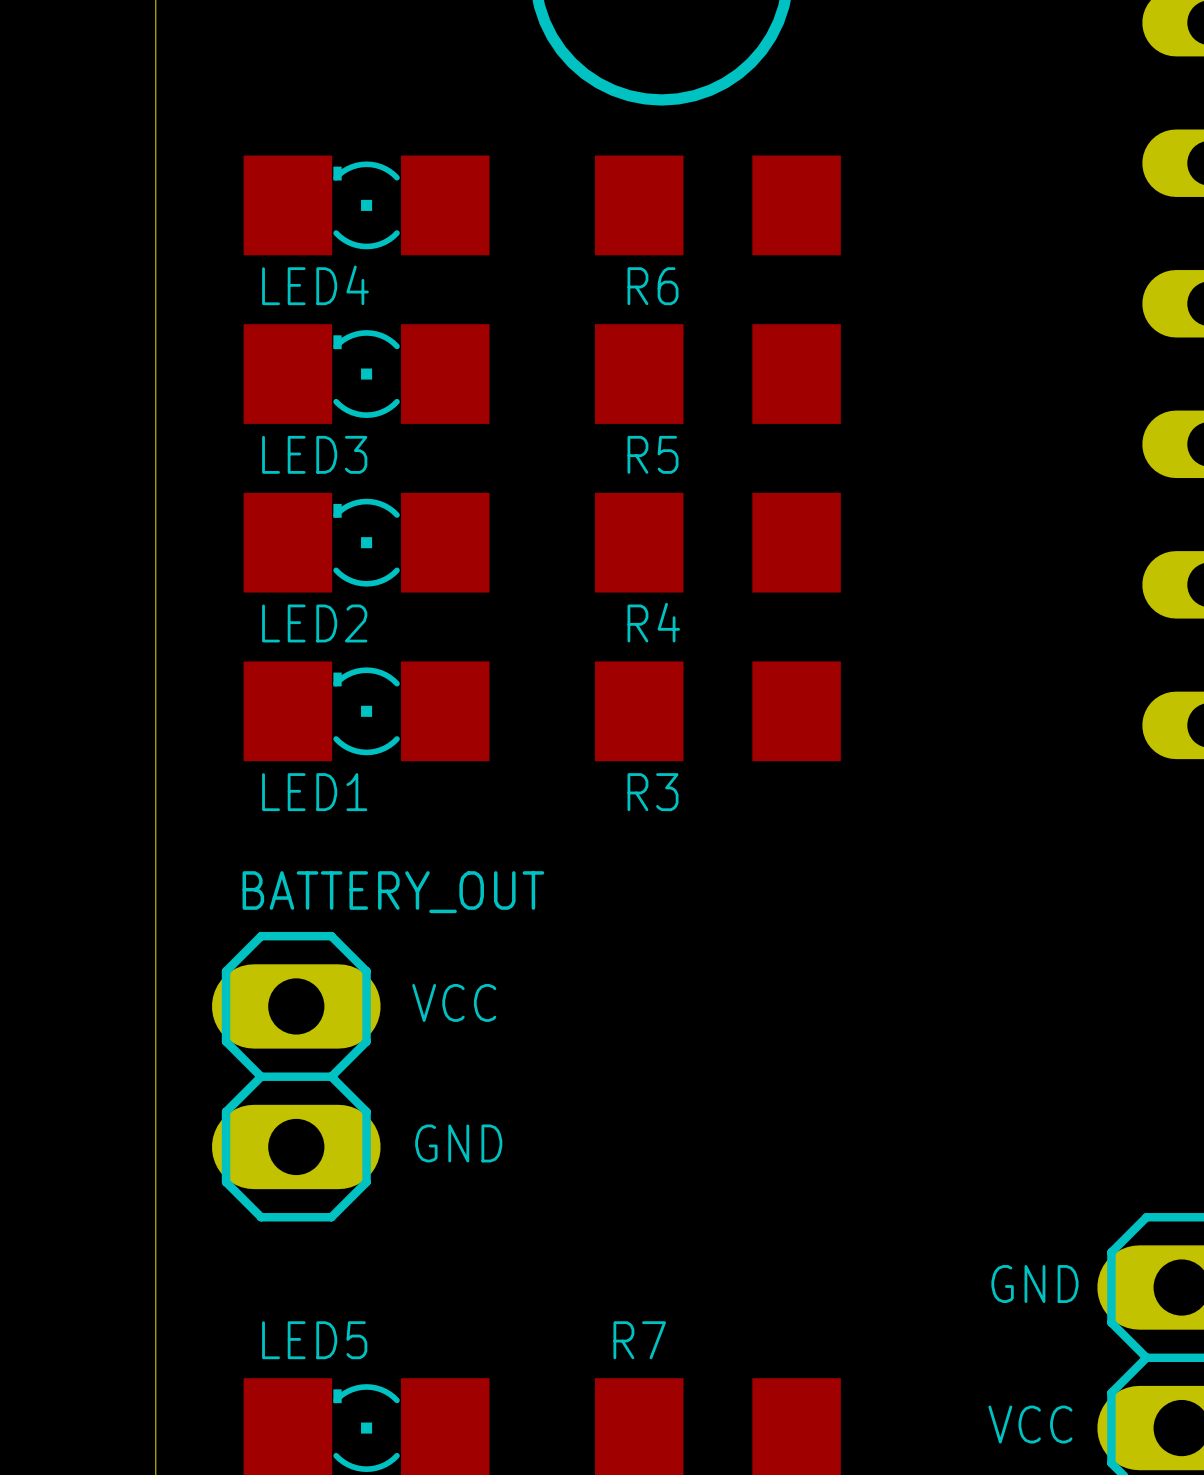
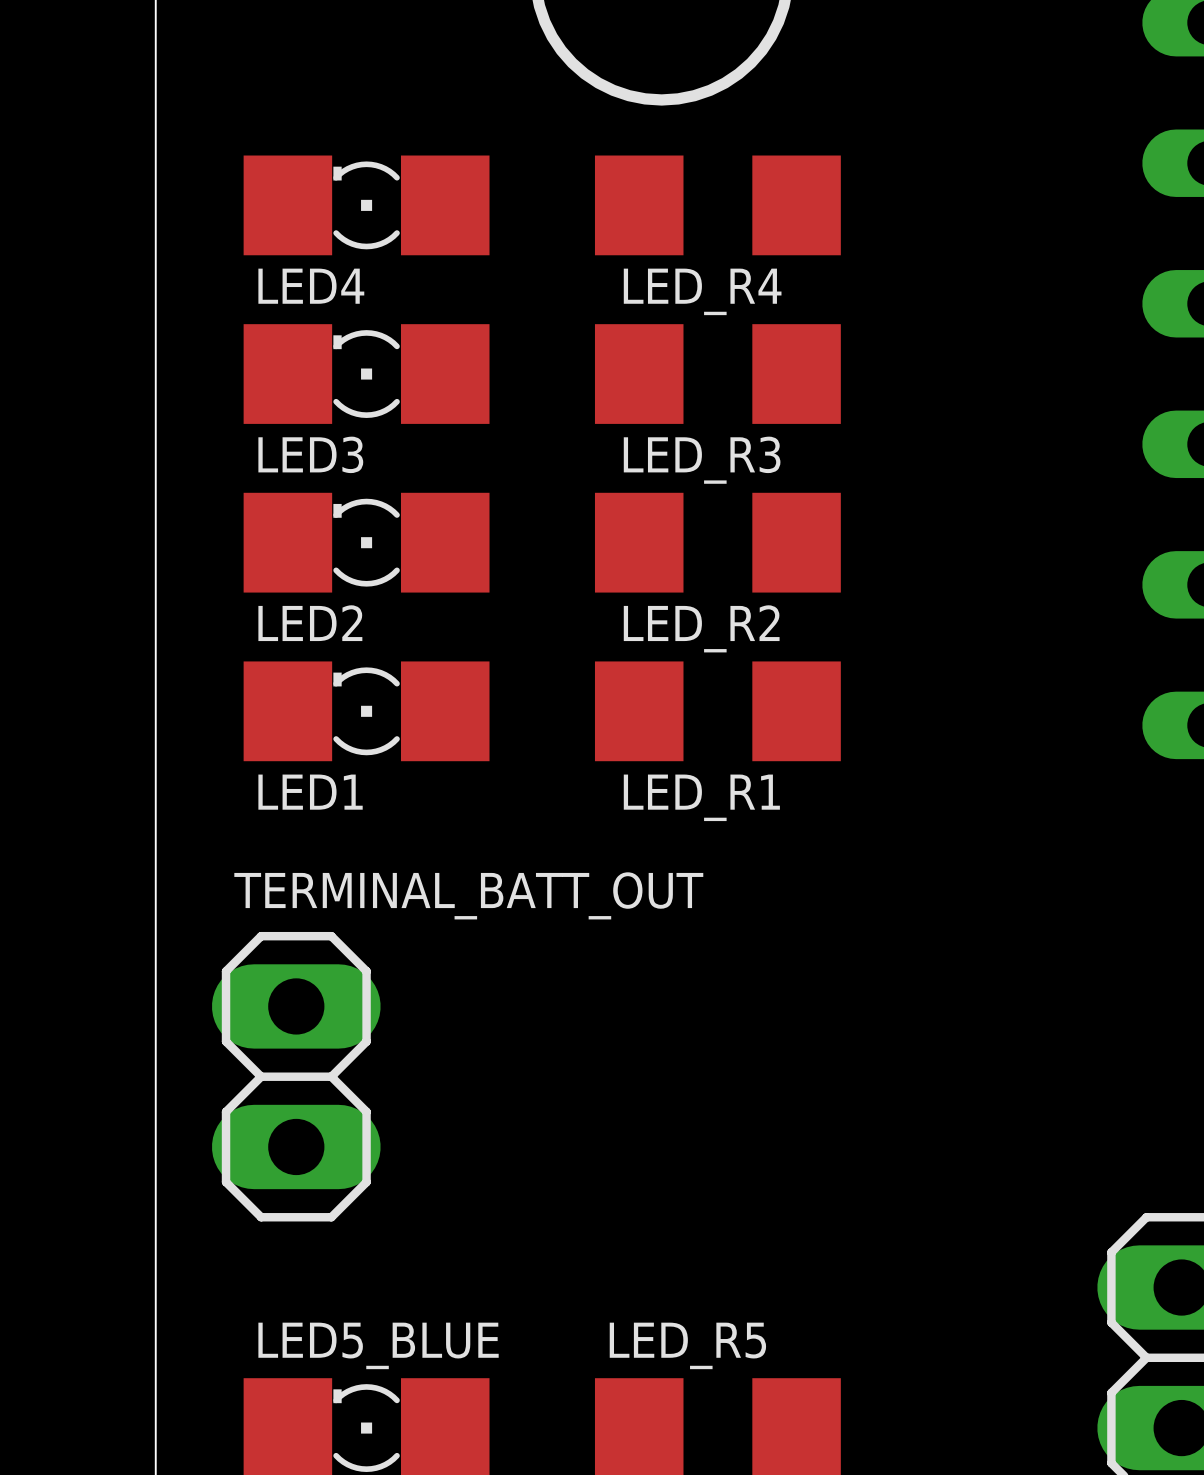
R6 name: R6 (653, 286) -> LED_R4 (702, 291)
R5 name: R5 (653, 454) -> LED_R3 (702, 460)
R4 name: R4 (653, 622) -> LED_R2 (701, 628)
R3 name: R3 (653, 792) -> LED_R1 (701, 797)
BATTERY_OUT name: BATTERY_OUT (393, 892) -> TERMINAL_BATT_OUT (468, 895)
text: VCC (454, 1002) -> none
text: GND (458, 1143) -> none
text: GND (1034, 1284) -> none
LED5 name: LED5 (314, 1340) -> LED5_BLUE (378, 1345)
R7 name: R7 (639, 1340) -> LED_R5 (687, 1345)
text: VCC (1030, 1424) -> none

